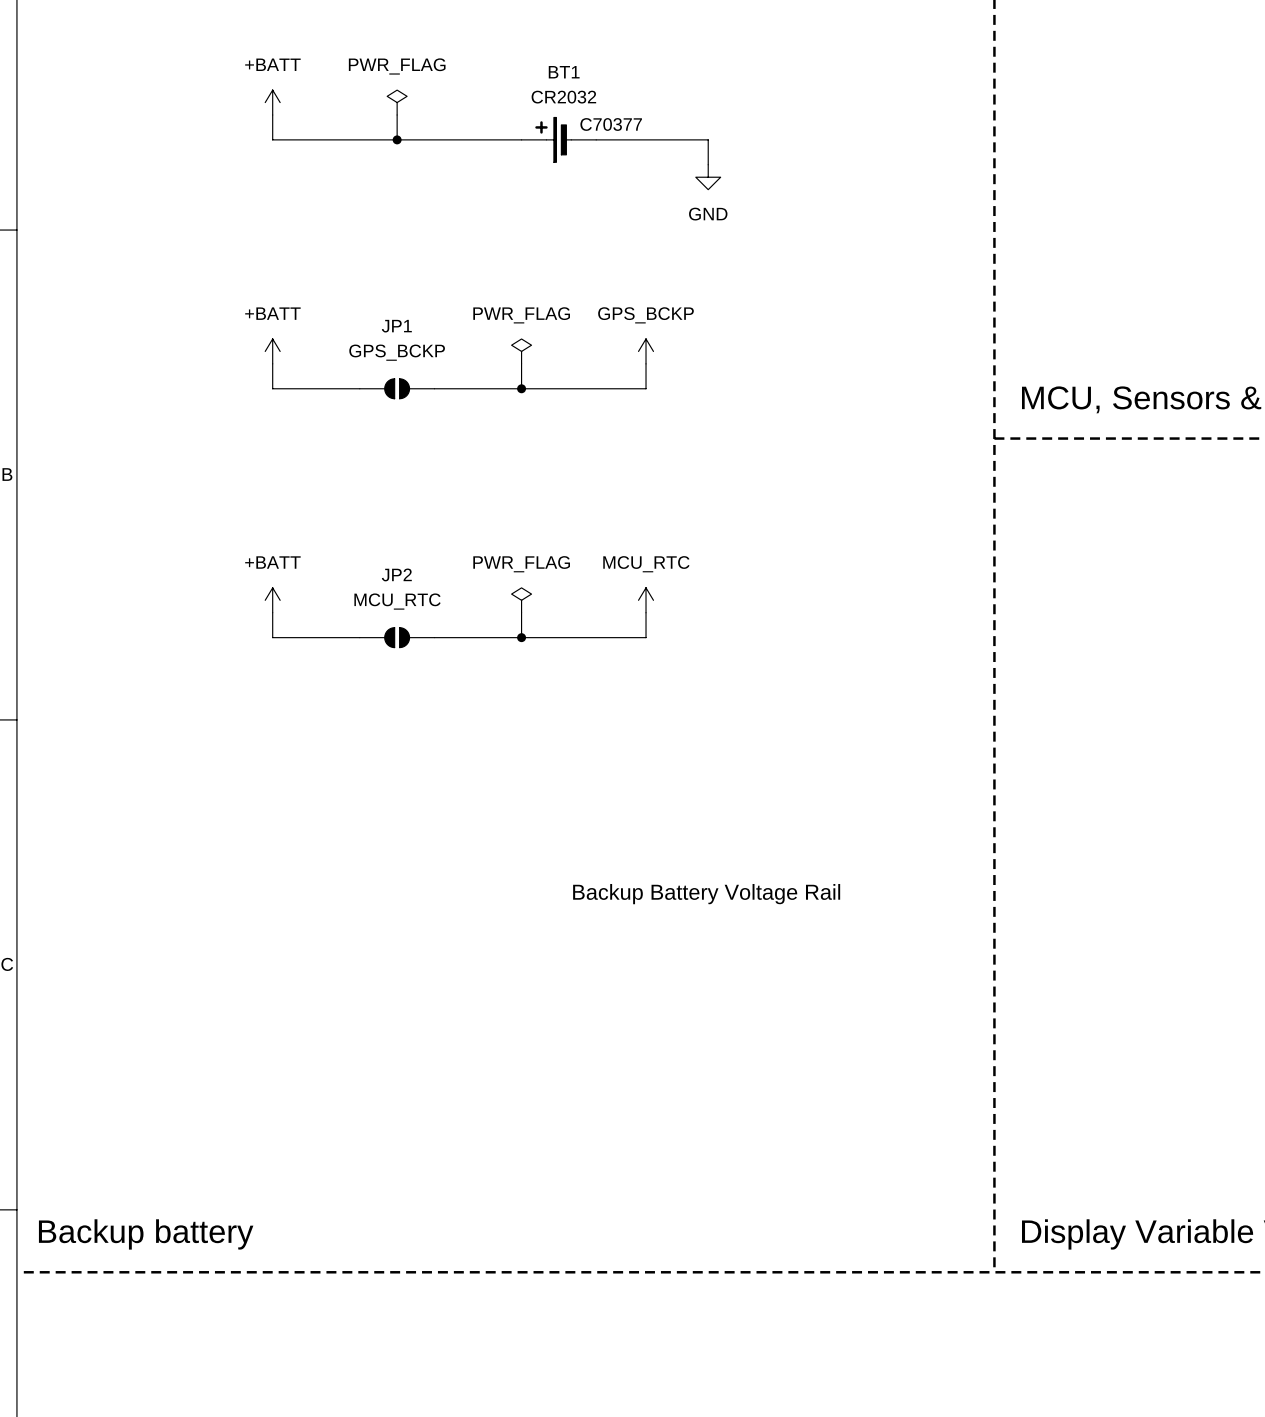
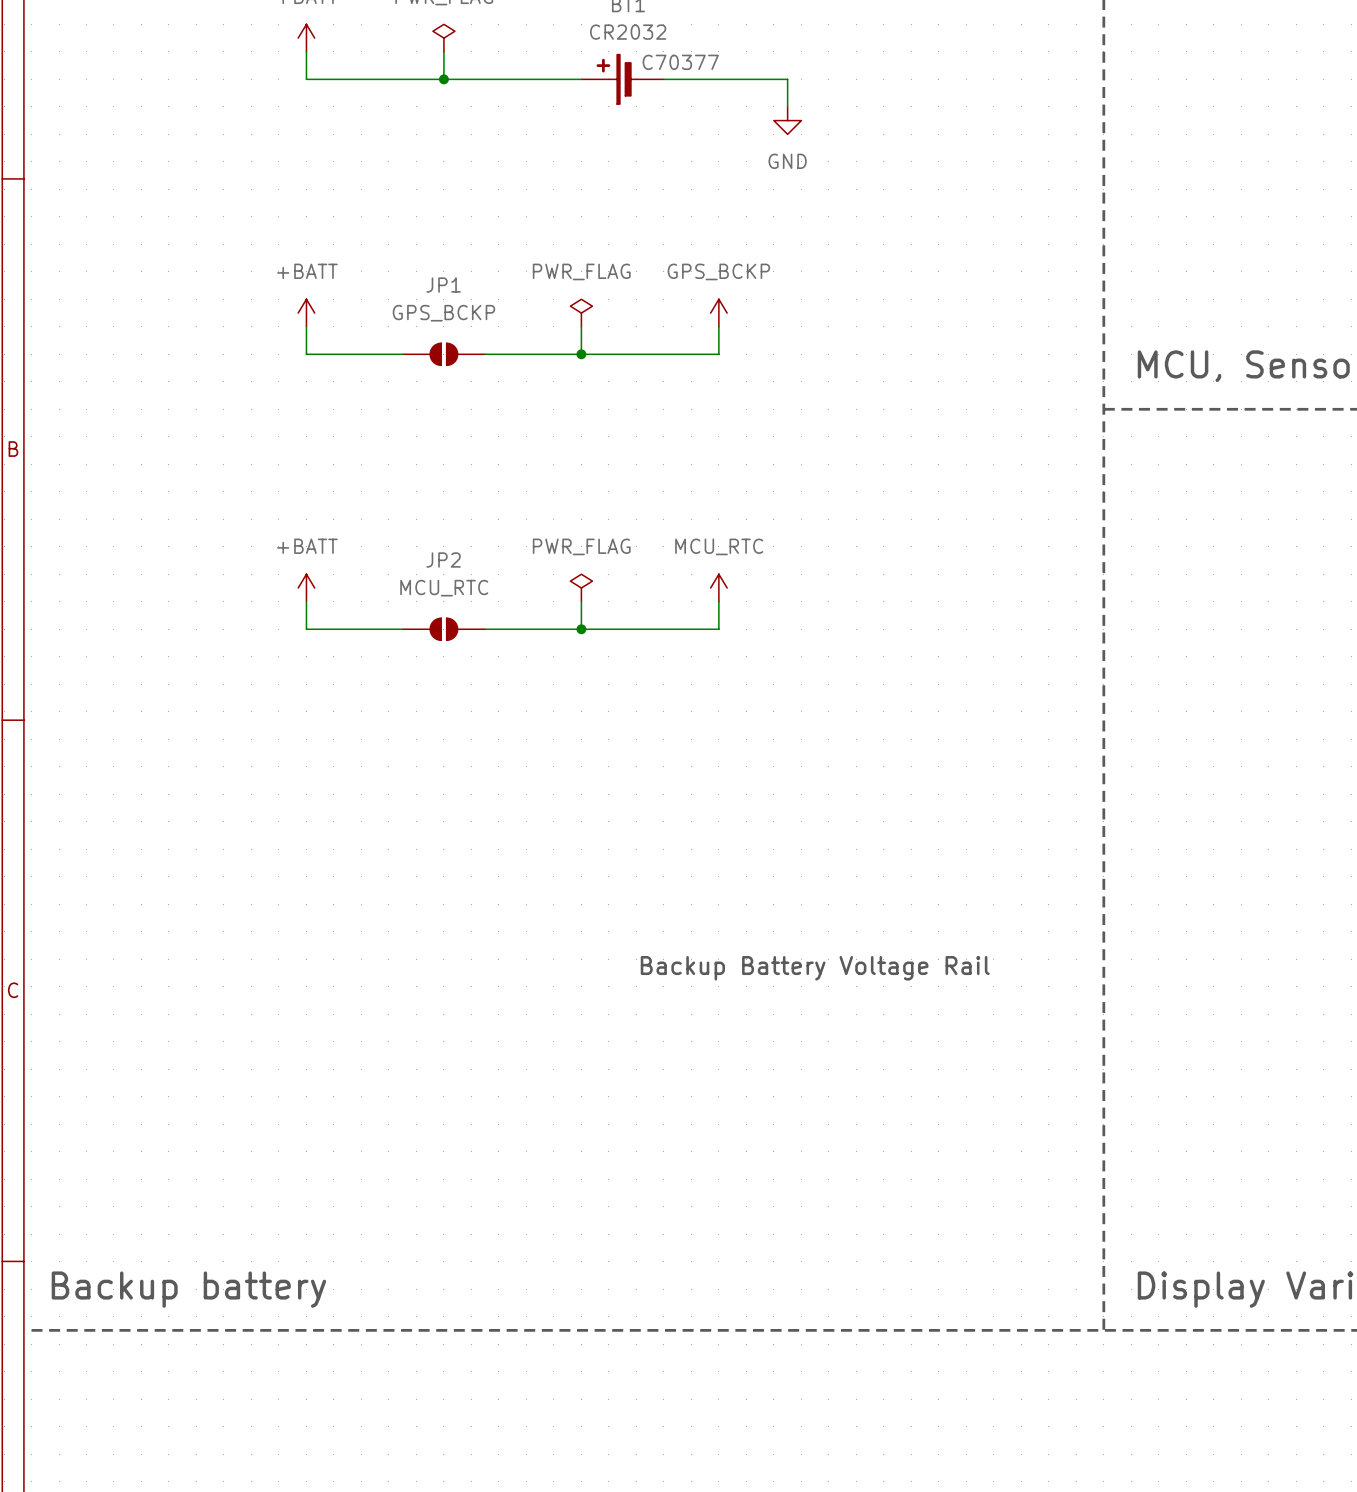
text position: Backup Battery Voltage Rail (706, 894) -> Backup Battery Voltage Rail (815, 968)

